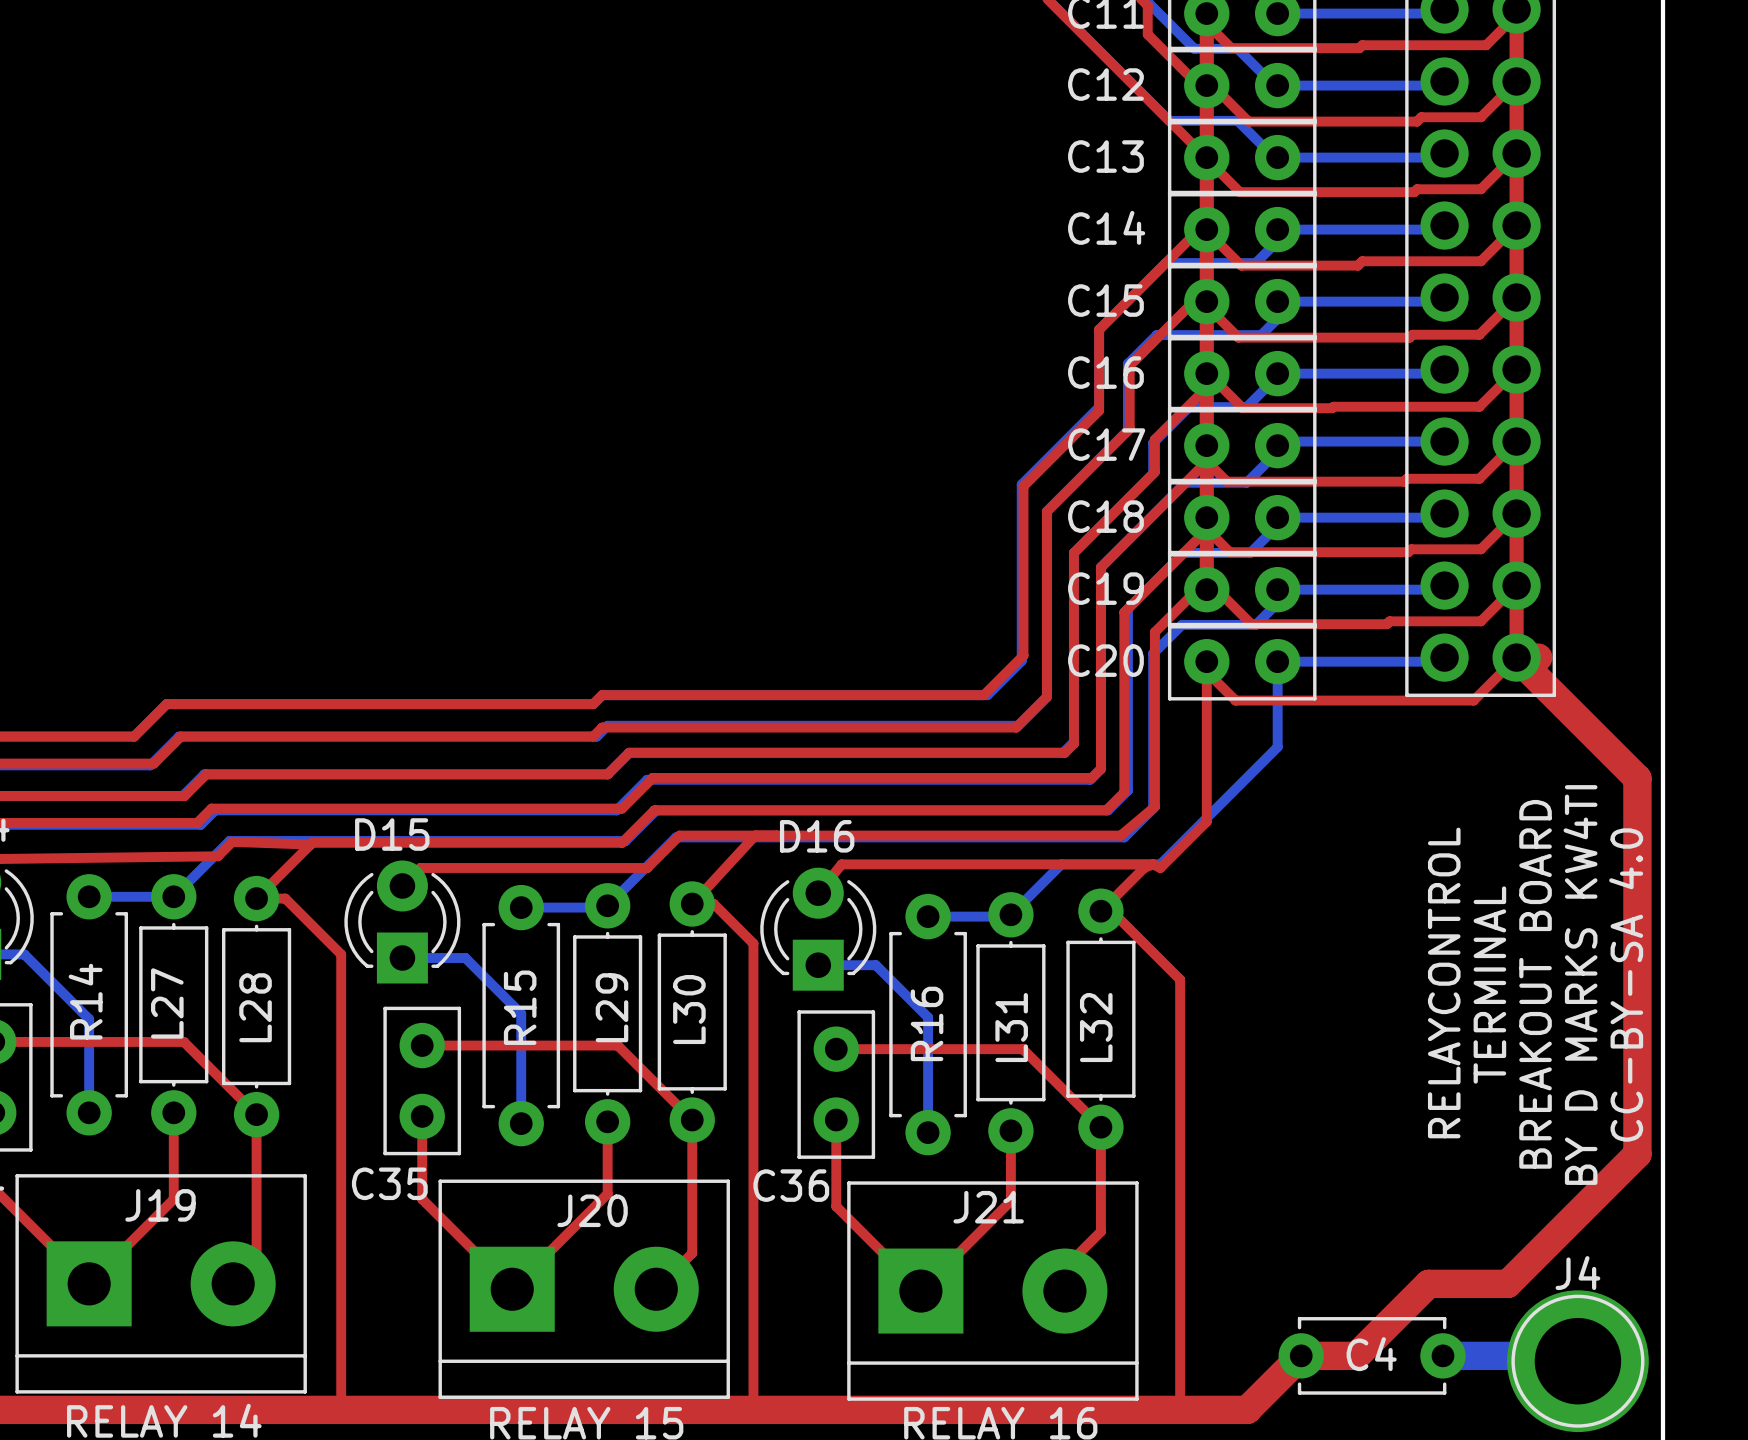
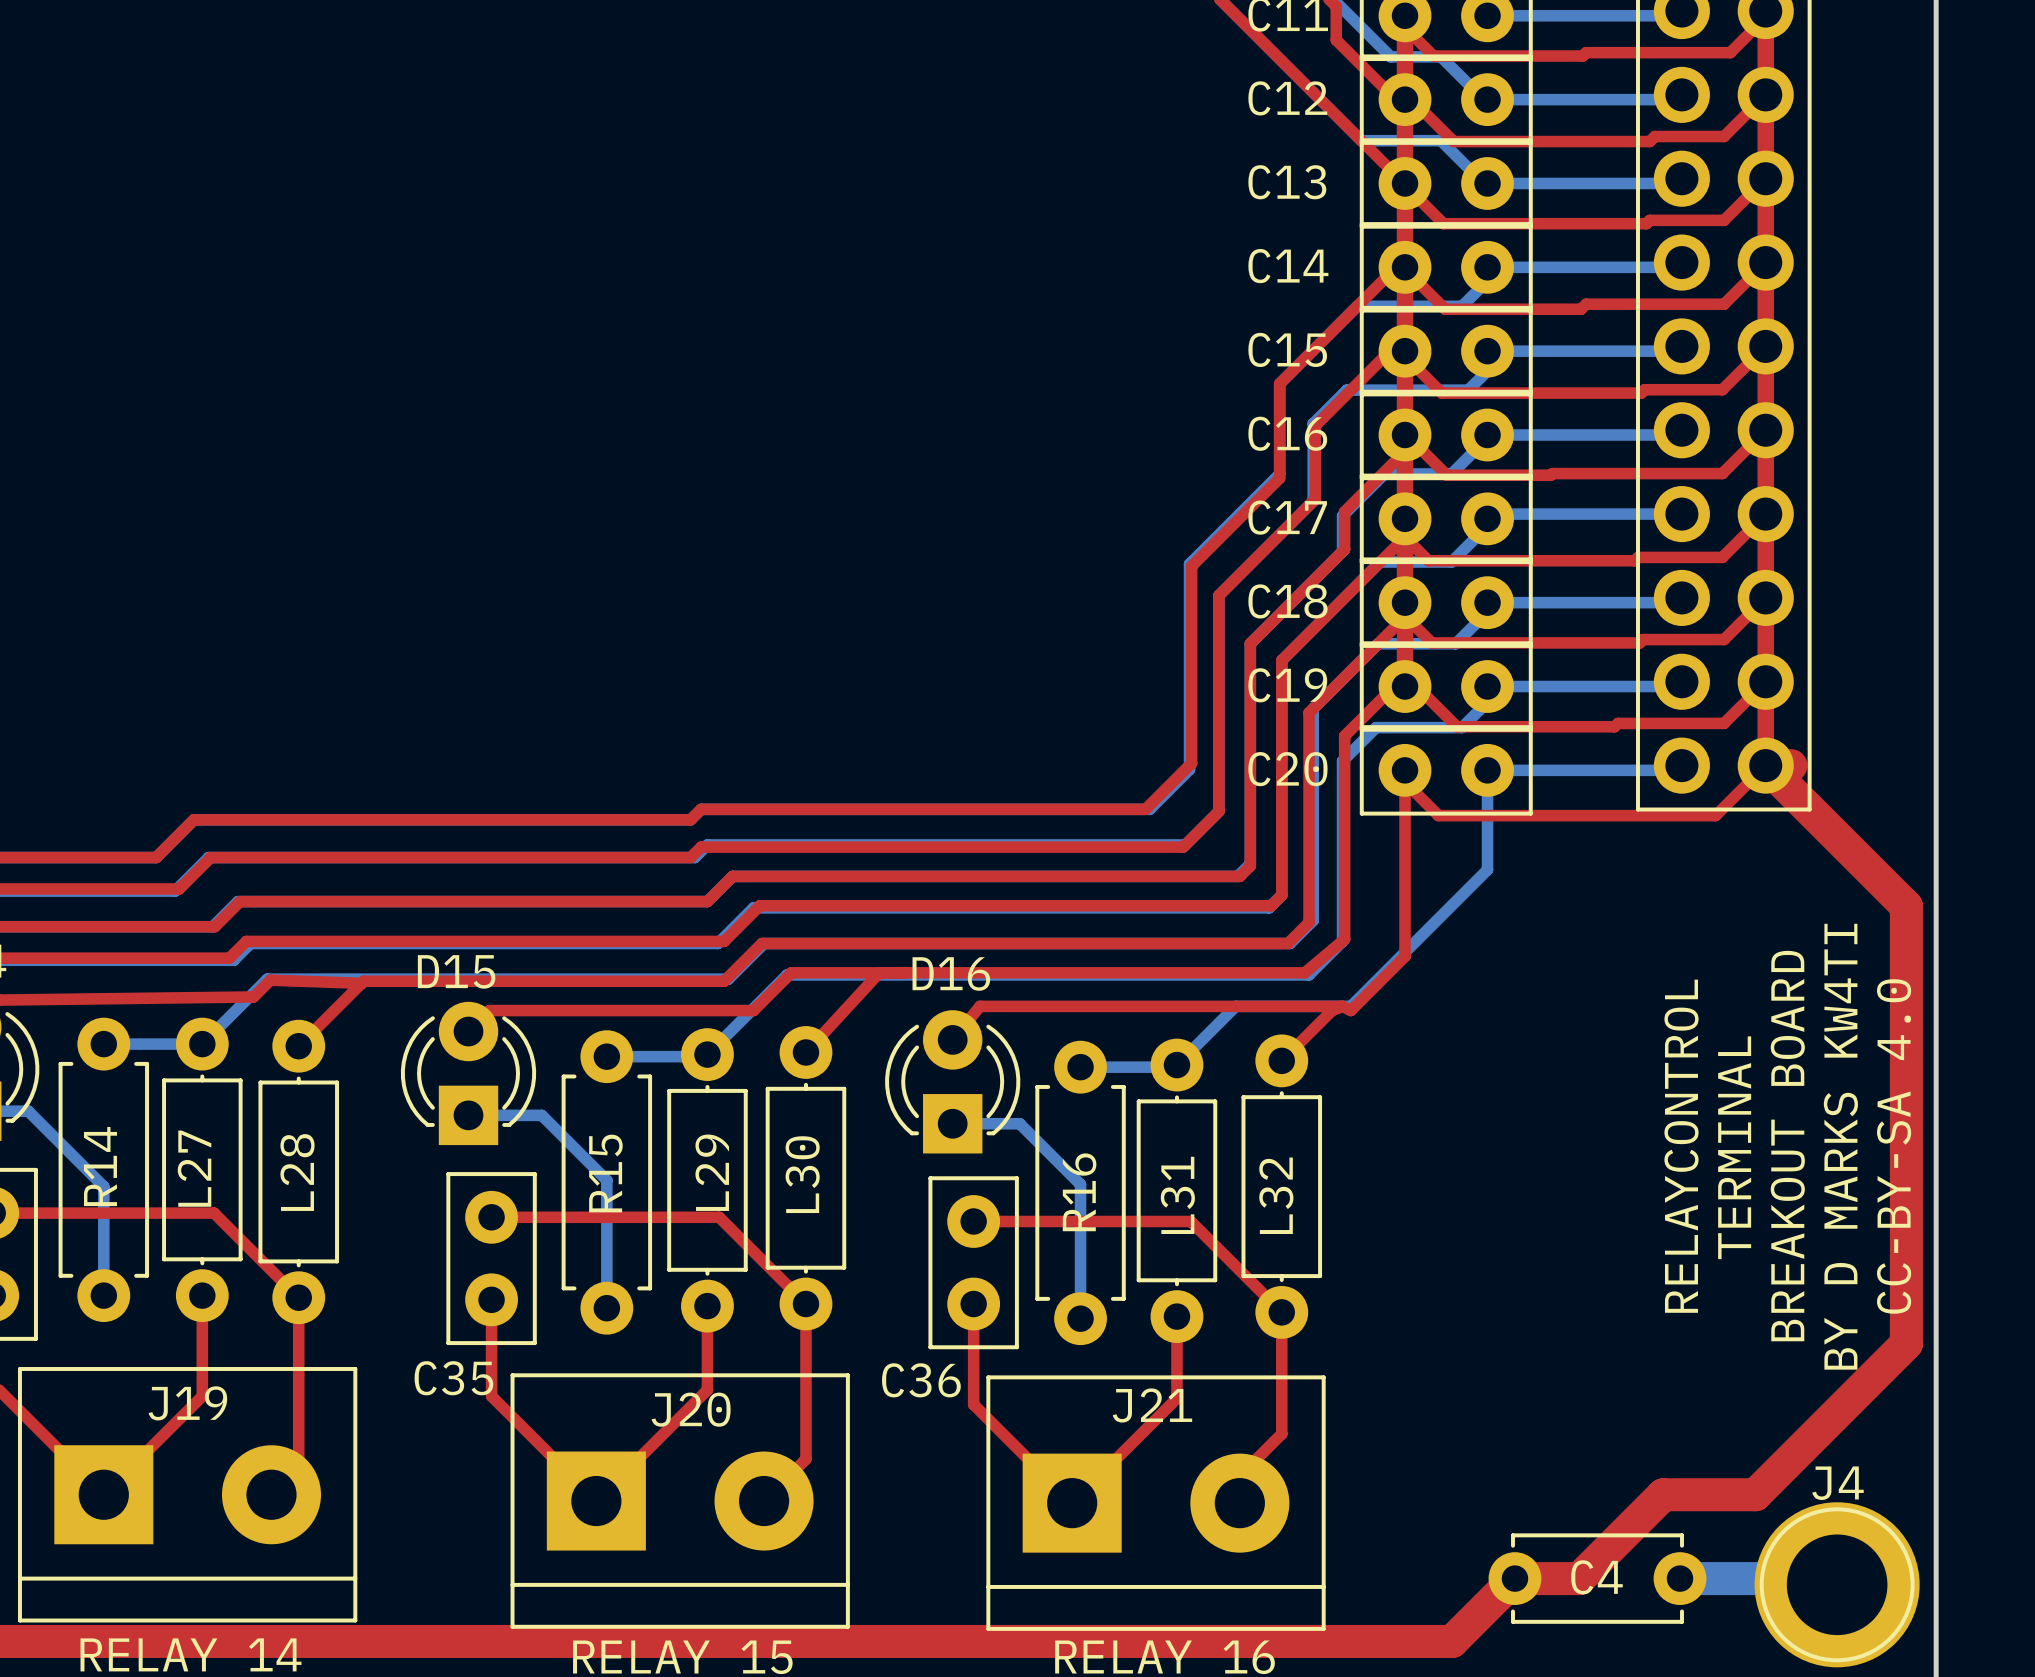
top track: (256, 898) (285, 898) (341, 954) (341, 1409) -> none
top track: (692, 903) (713, 903) (753, 943) (753, 1409) -> none
top track: (1100, 911) (1111, 911) (1180, 979) (1180, 1409) -> none

